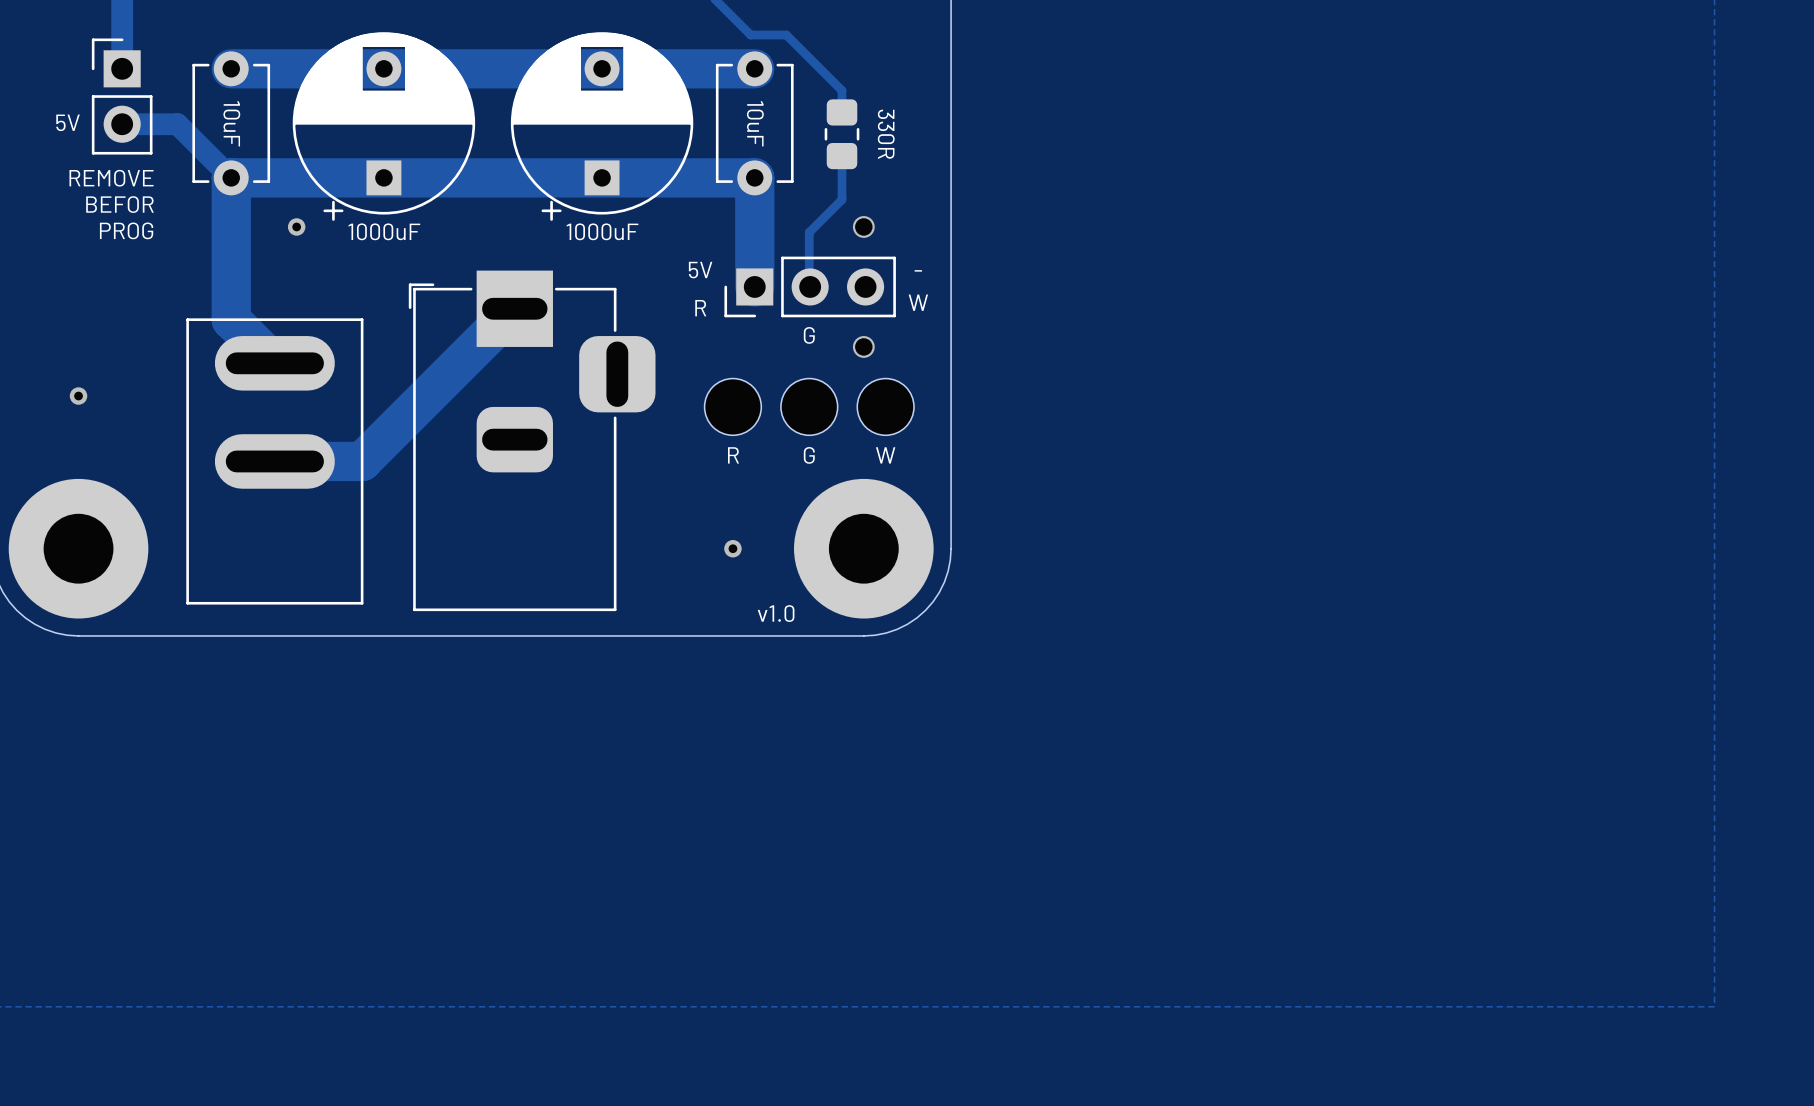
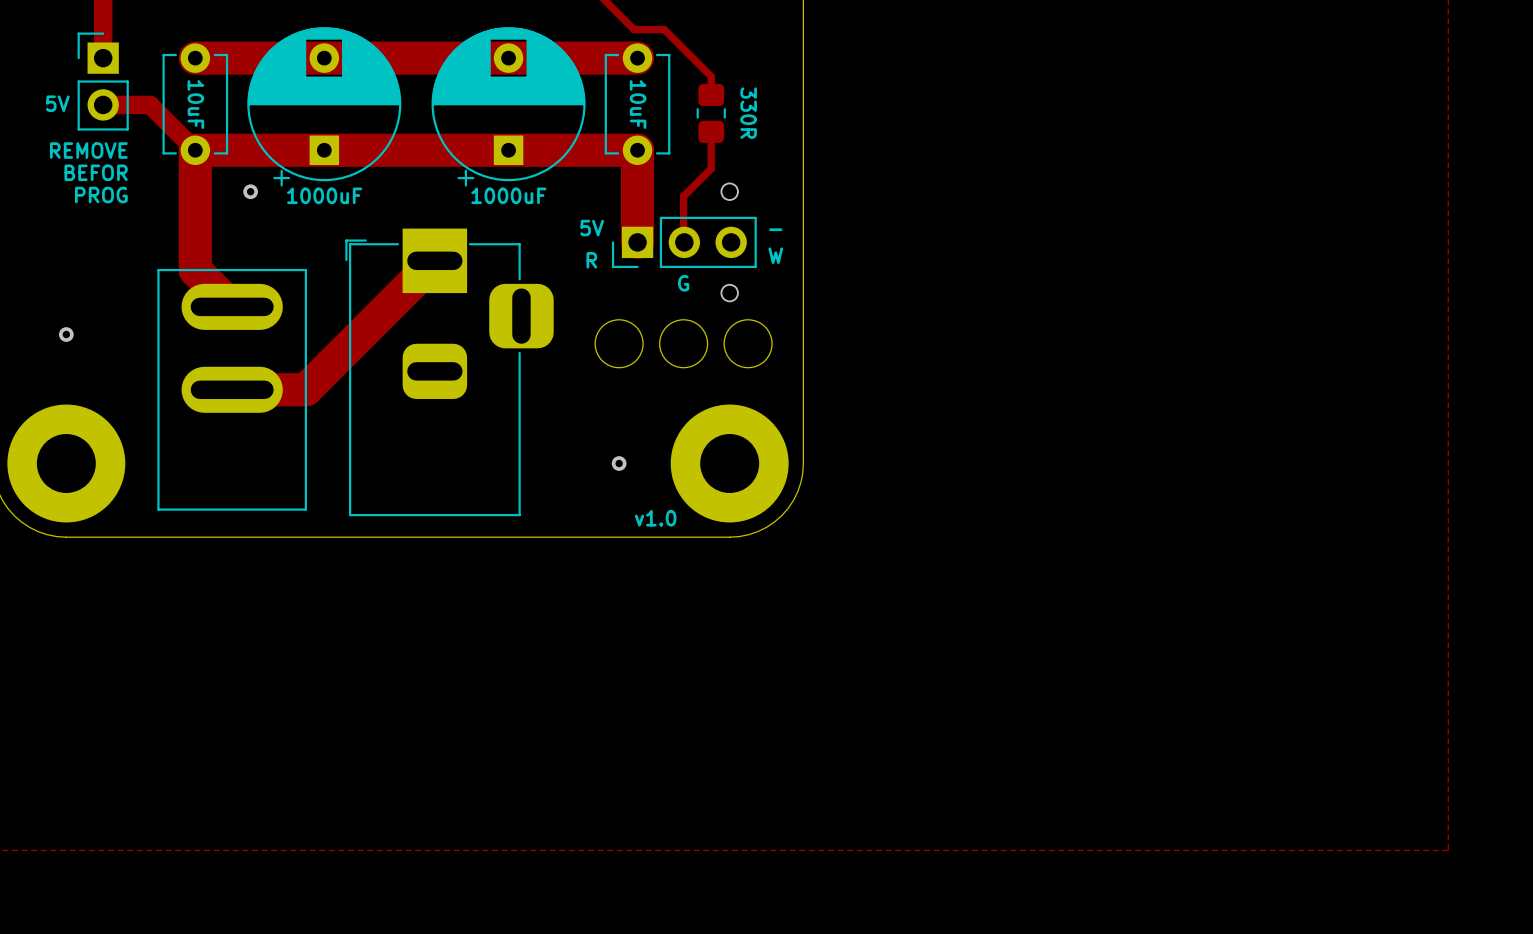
text: R (733, 455) -> none
text: G (809, 455) -> none
text: W (885, 455) -> none

